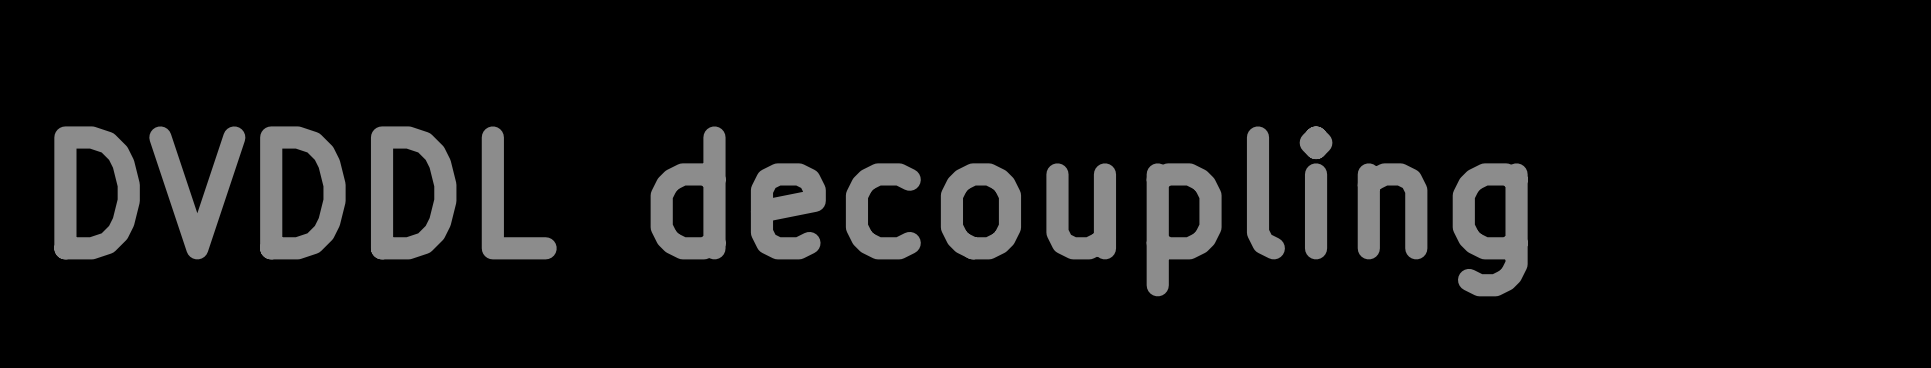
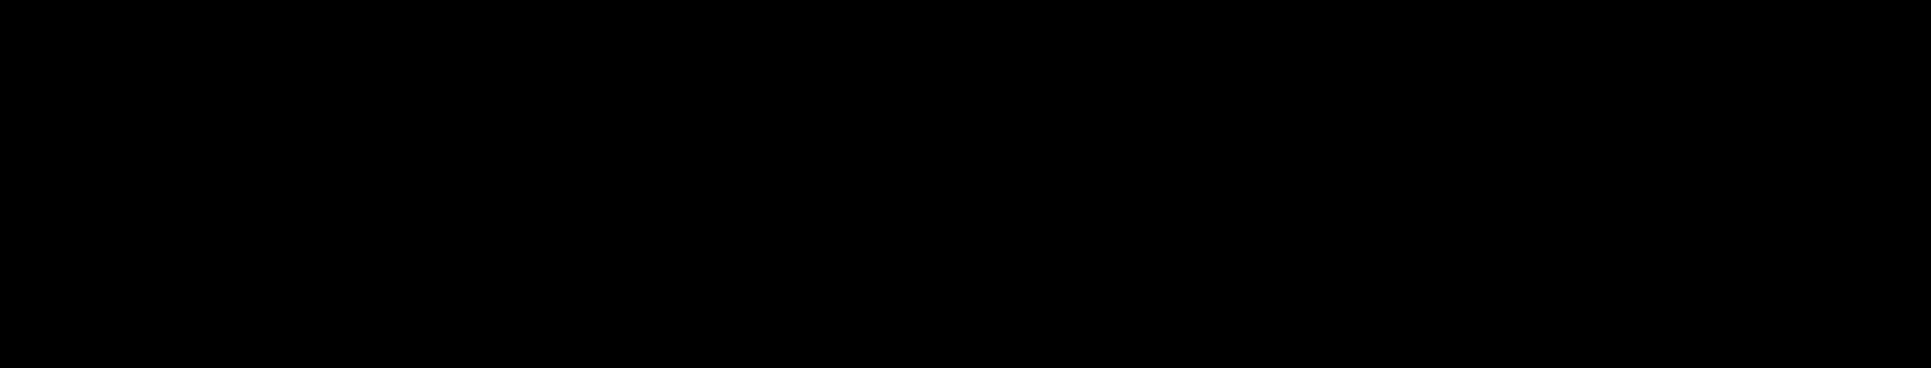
text: DVDDL decoupling (790, 211) -> none

